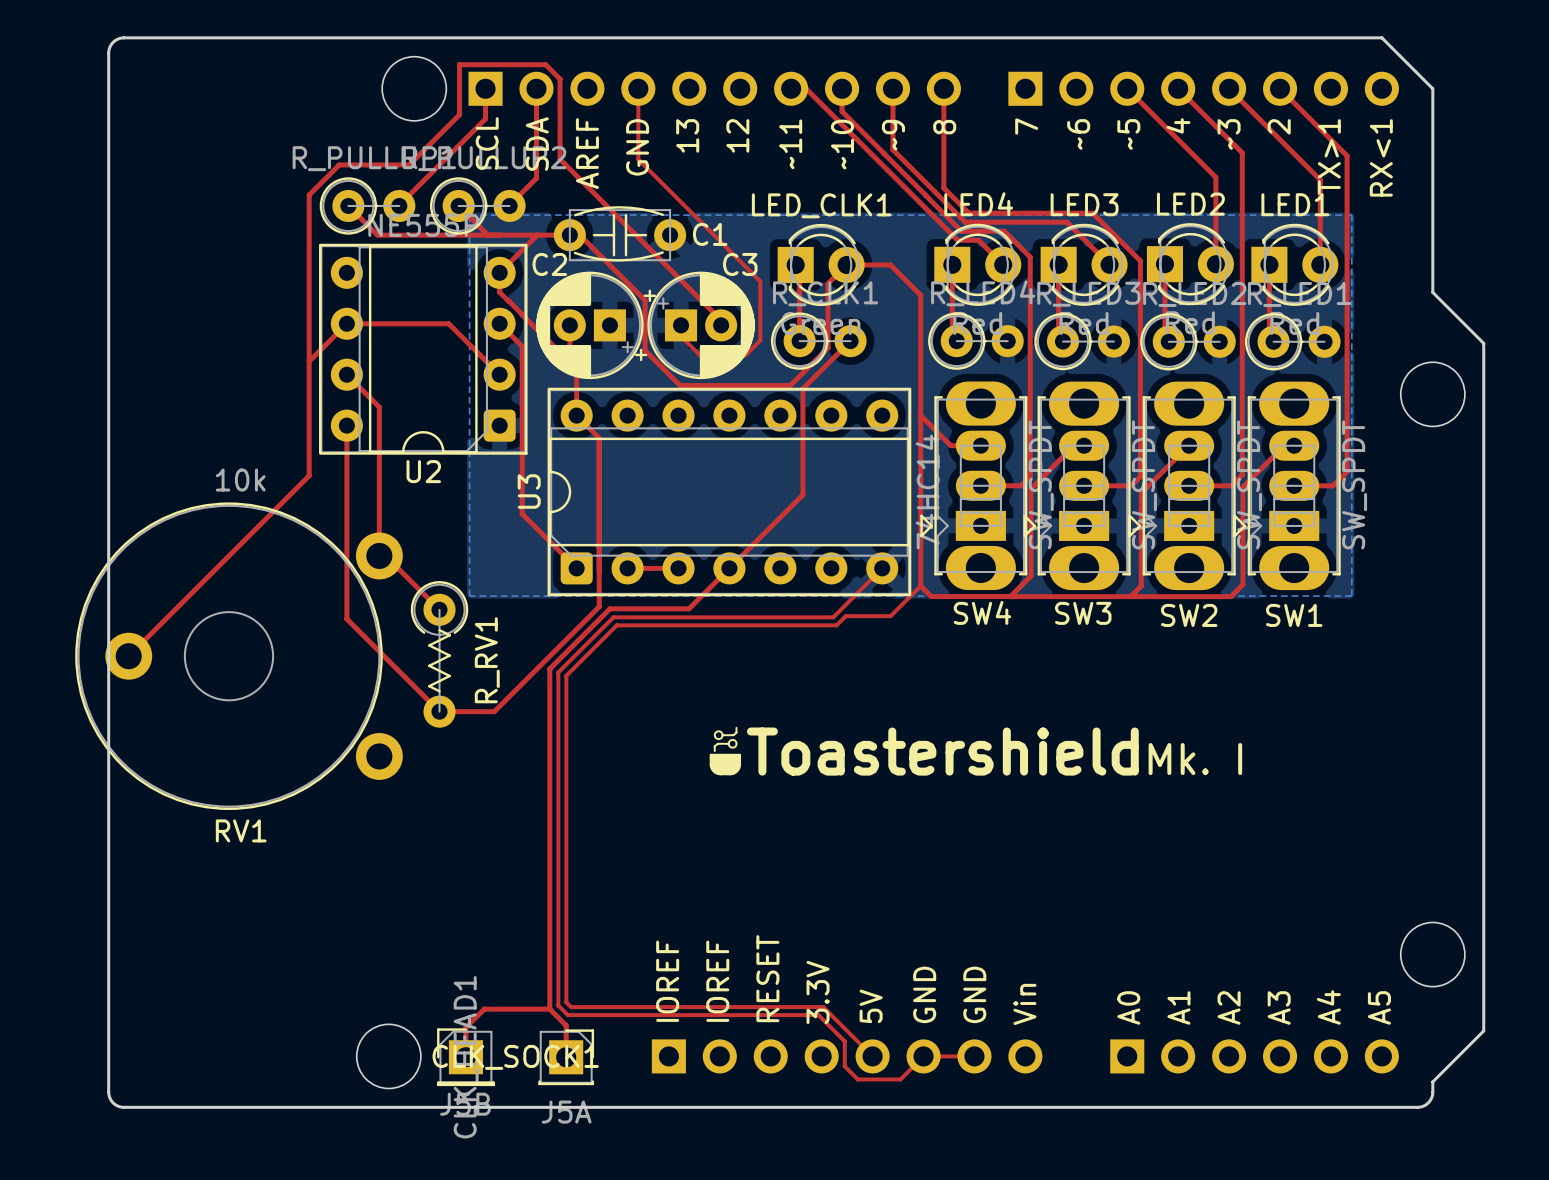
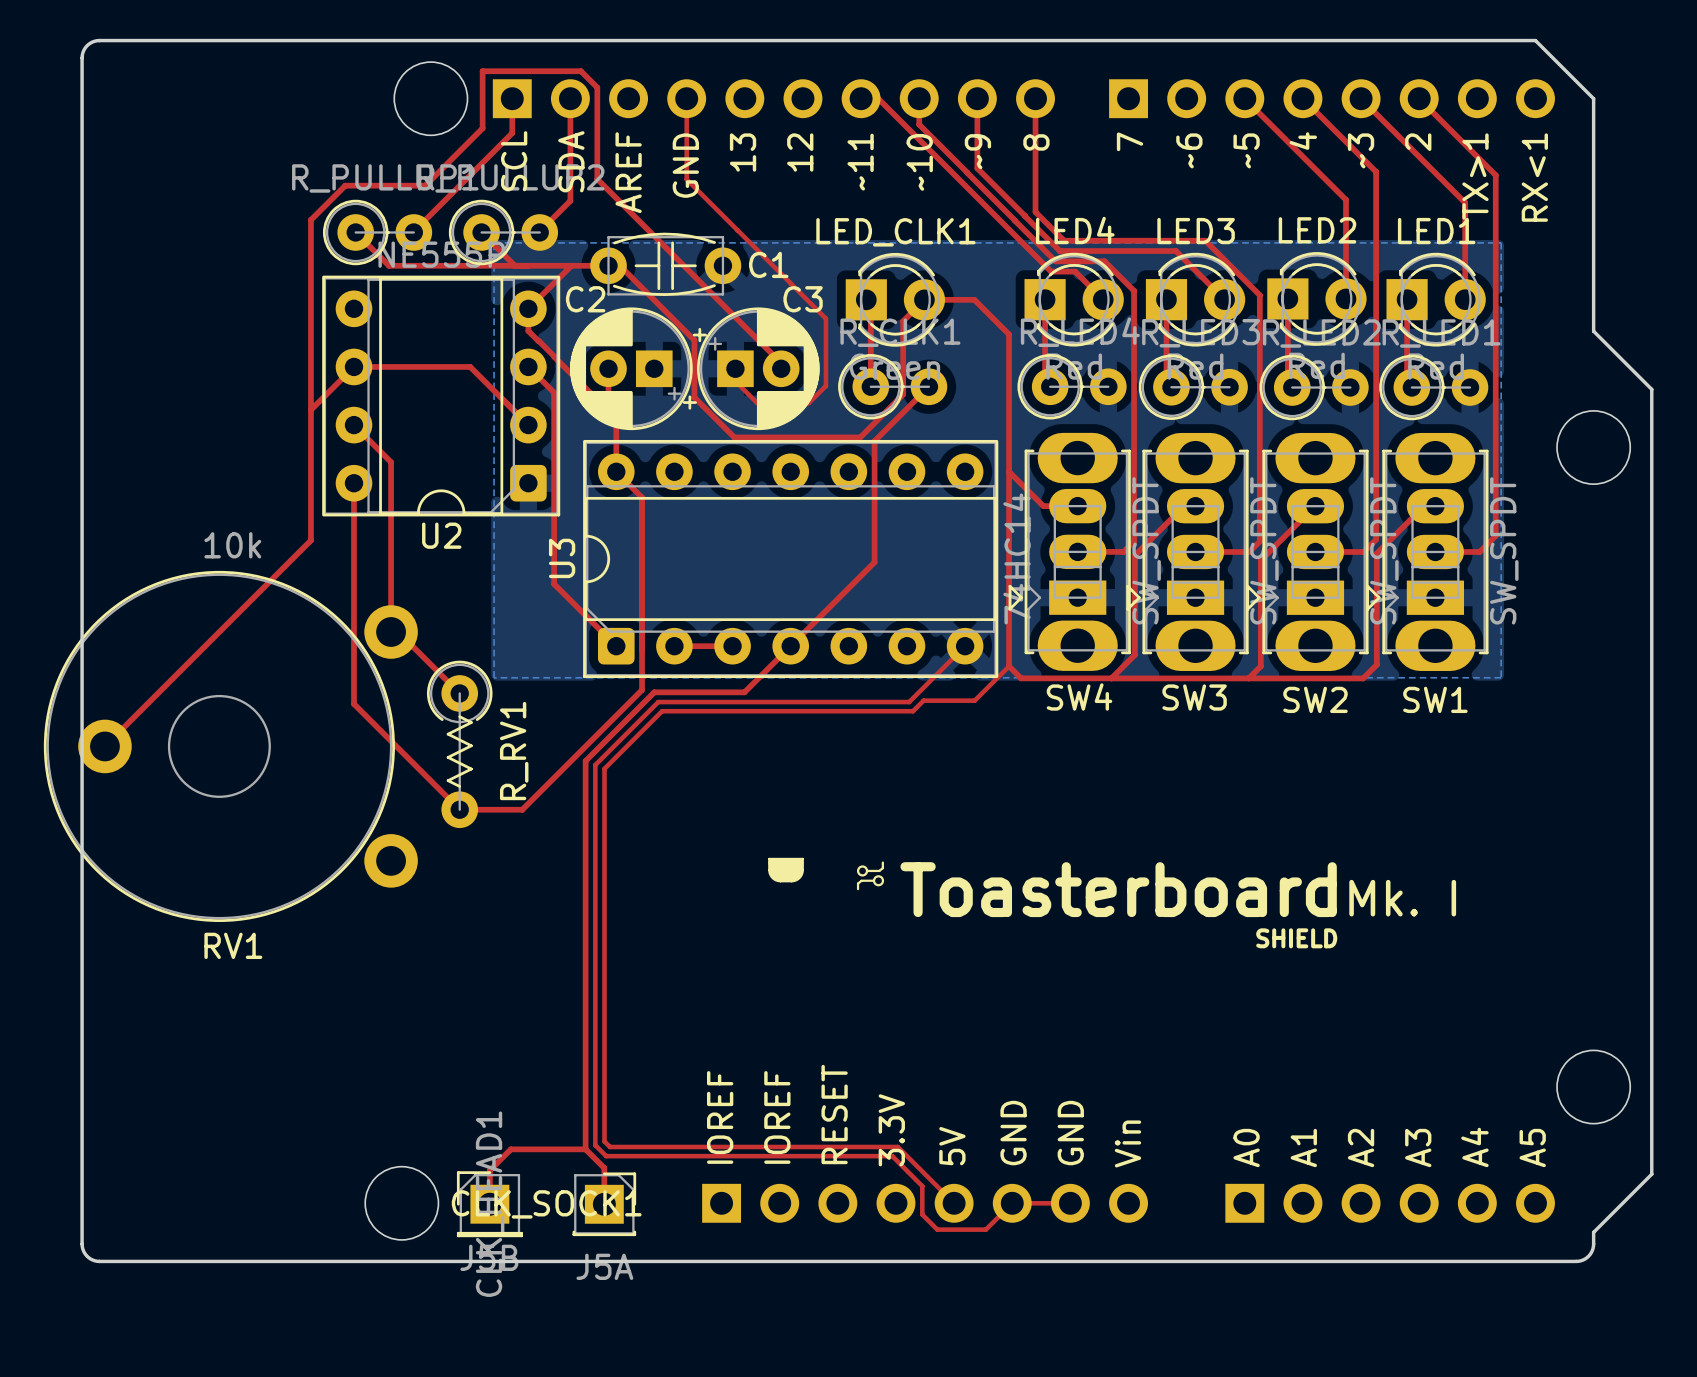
line: (736, 727) (736, 732) (733, 735) (722, 735) -> none
drawing: [713, 730, 738, 749] -> none
line: (728, 743) (717, 743) (714, 746) (714, 751) -> none
text: Toastershield (942, 751) -> Toasterboard (1118, 889)
line: none -> (882, 862) (882, 868) (879, 870)
text position: Mk. I (1195, 759) -> Mk. I (1402, 898)
drawing: none -> [856, 865, 885, 887]
line: none -> (867, 870) (879, 870)
line: none -> (861, 880) (858, 883) (858, 889)
line: none -> (861, 880) (873, 880)
text: none -> SHIELD (1296, 938)

